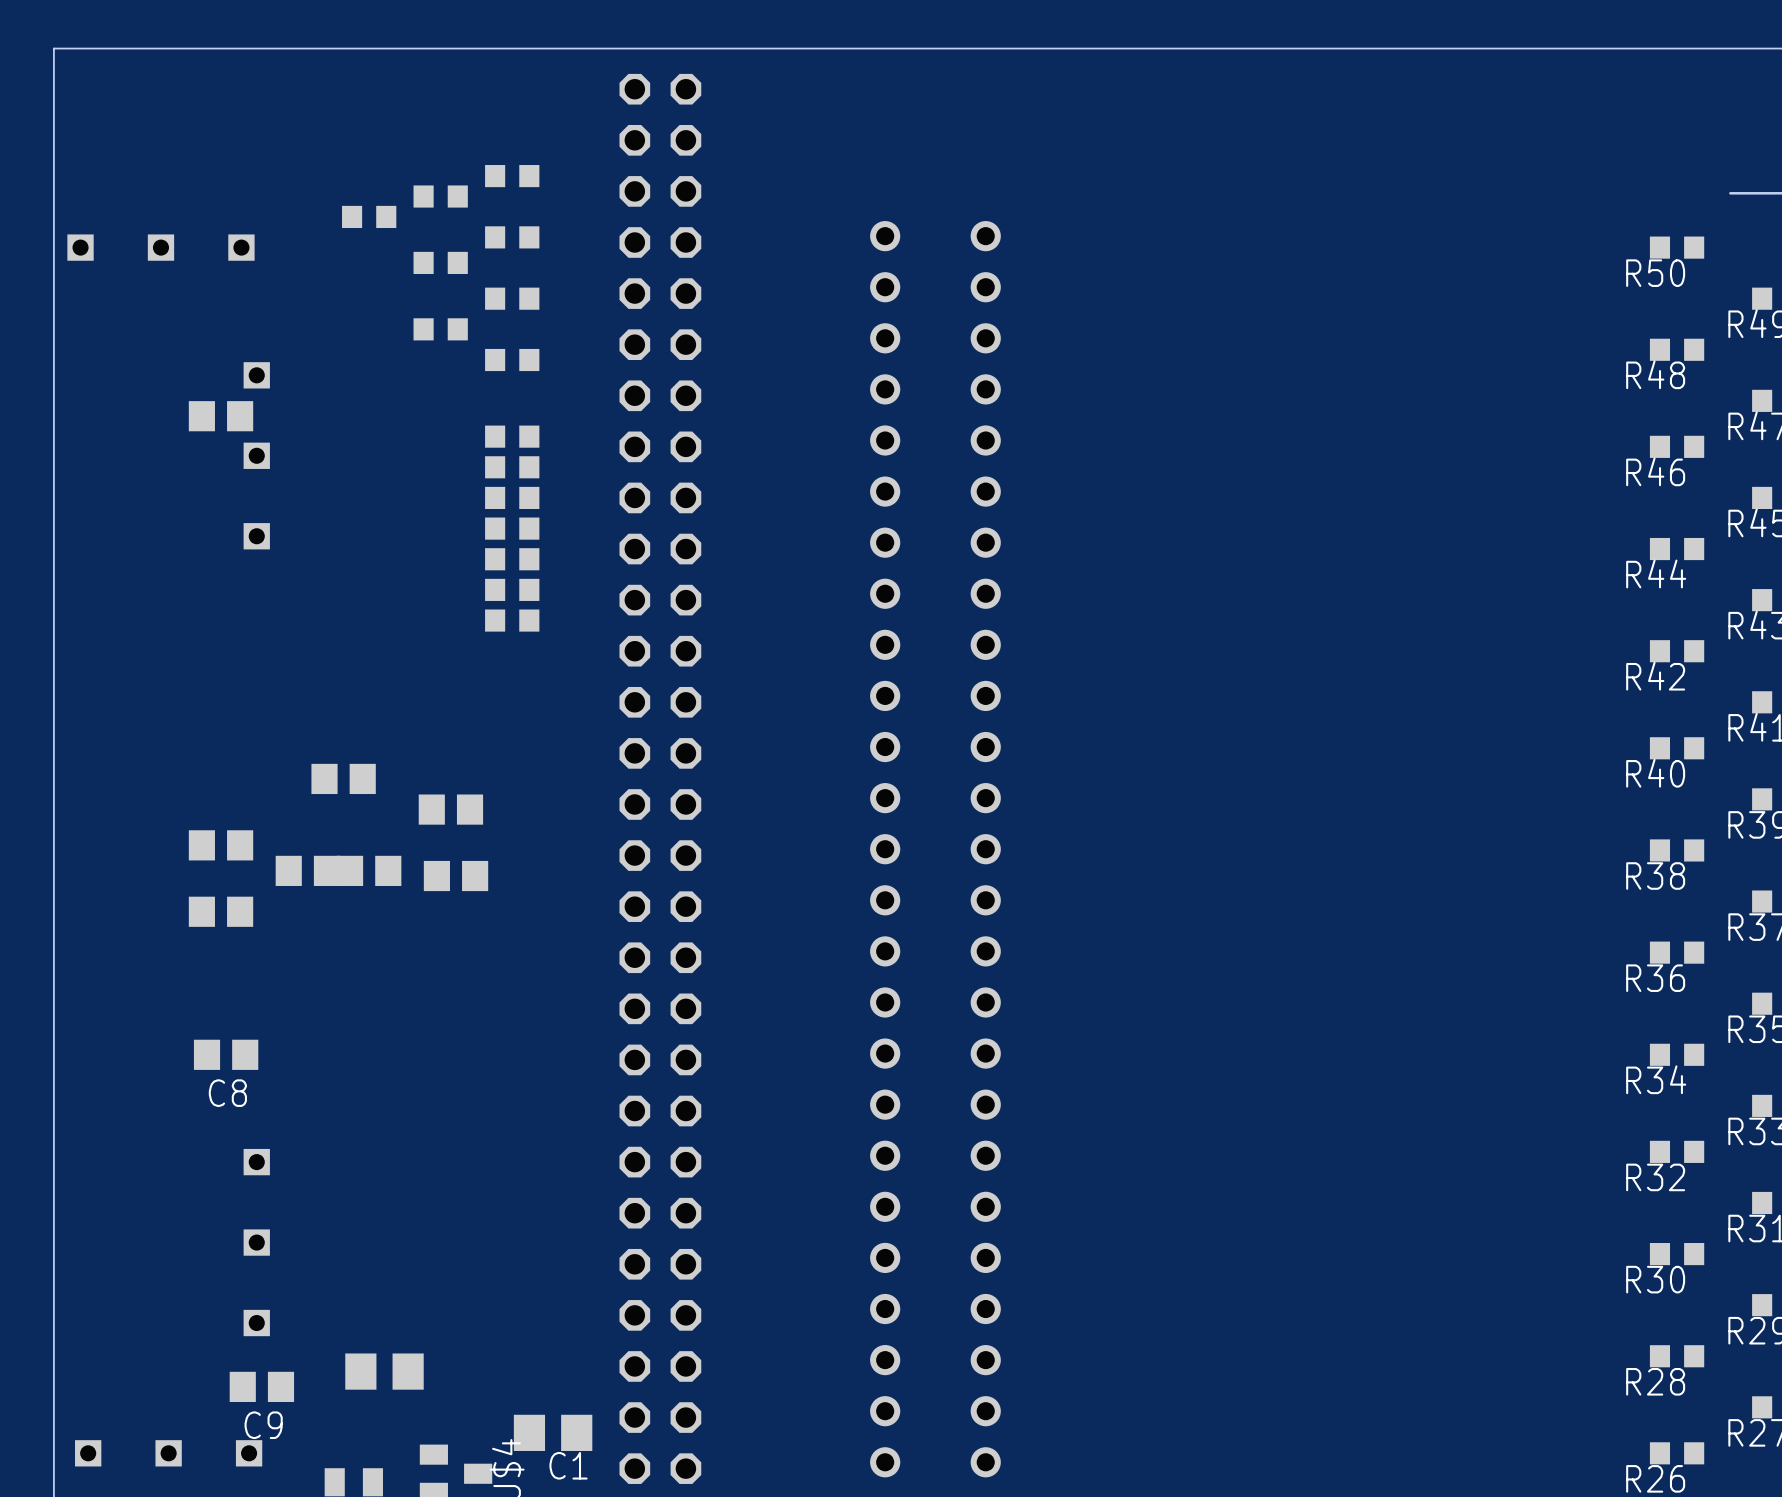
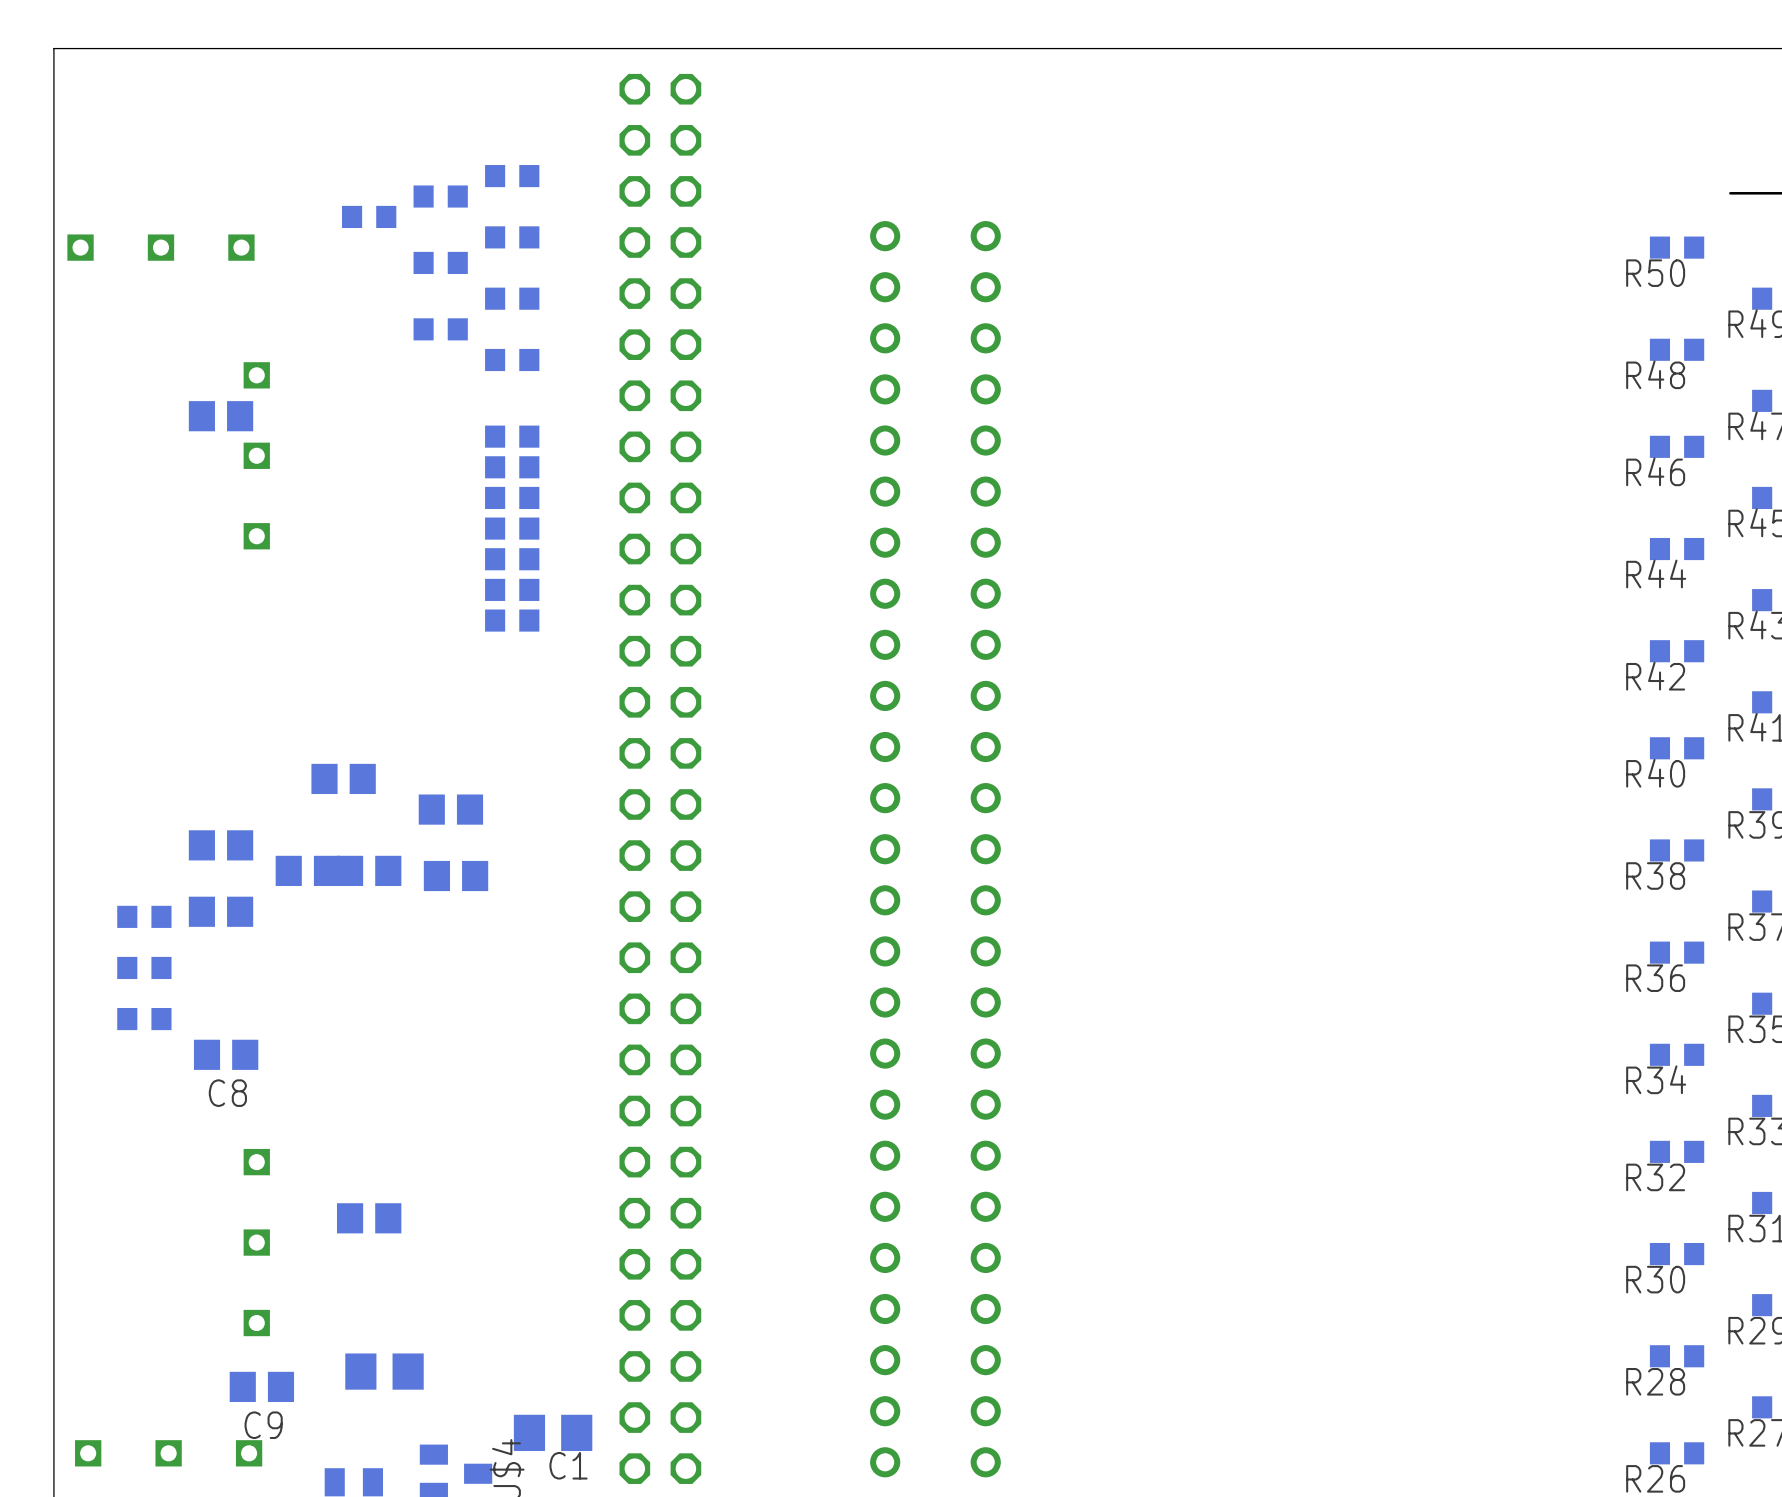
part: none -> (144, 916)
part: none -> (144, 967)
part: none -> (144, 1019)
part: none -> (369, 1218)

